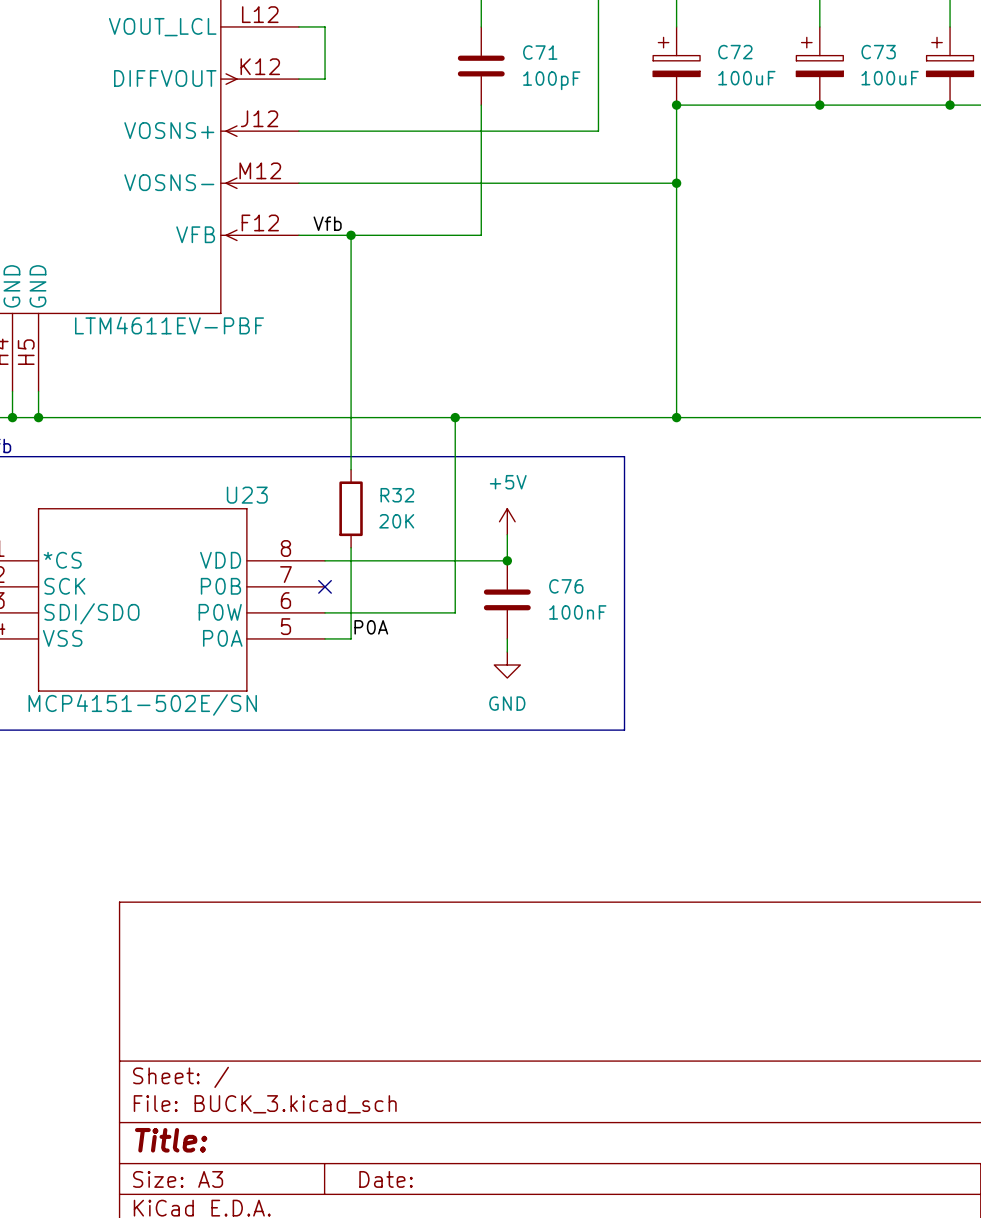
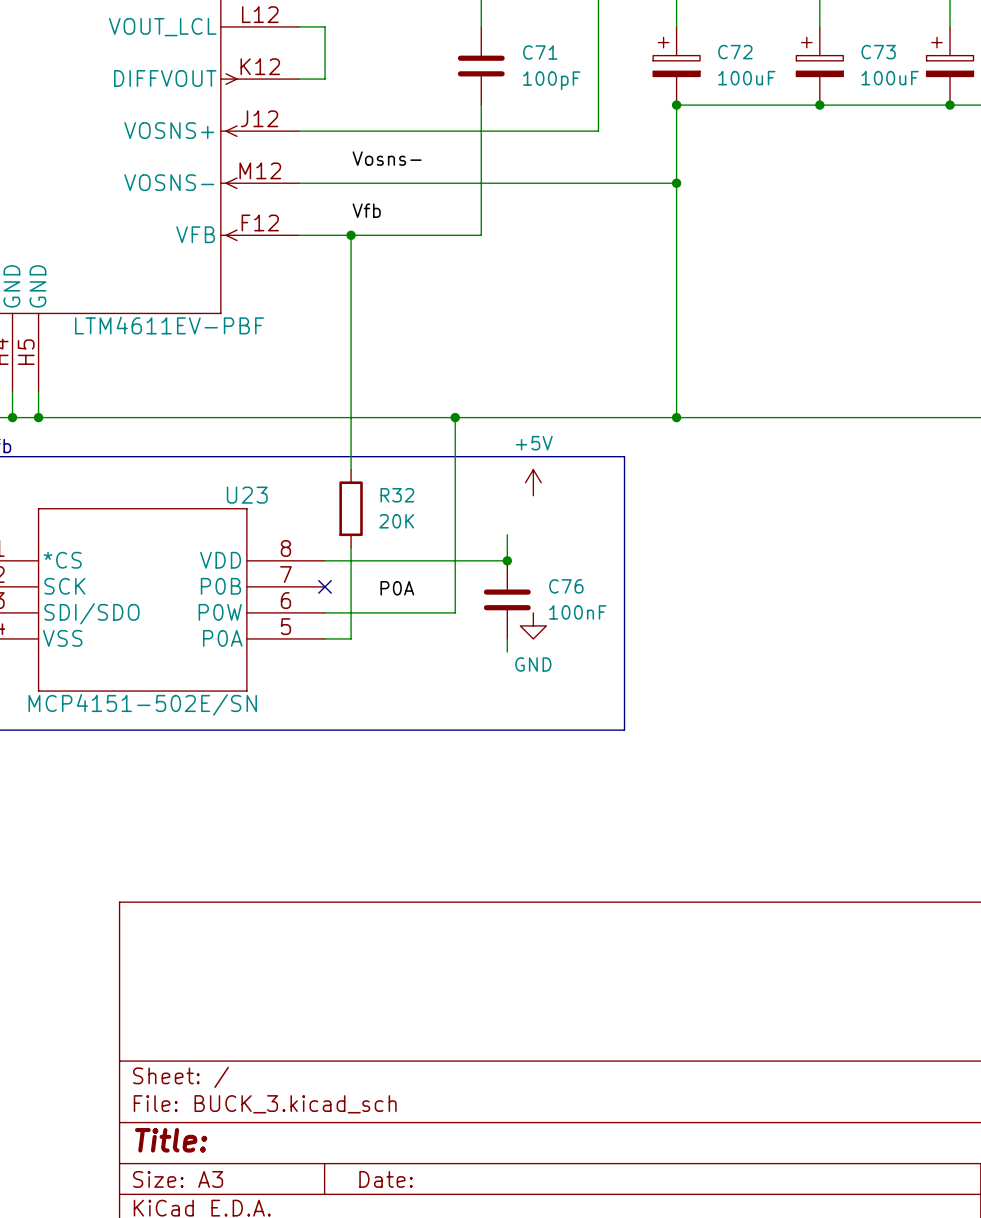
label: none -> Vosns- (387, 158)
label position: Vfb (327, 223) -> Vfb (366, 210)
power symbol position: +5V (507, 521) -> +5V (533, 482)
label position: P0A (371, 627) -> P0A (397, 588)
power symbol position: GND (507, 665) -> GND (533, 625)

